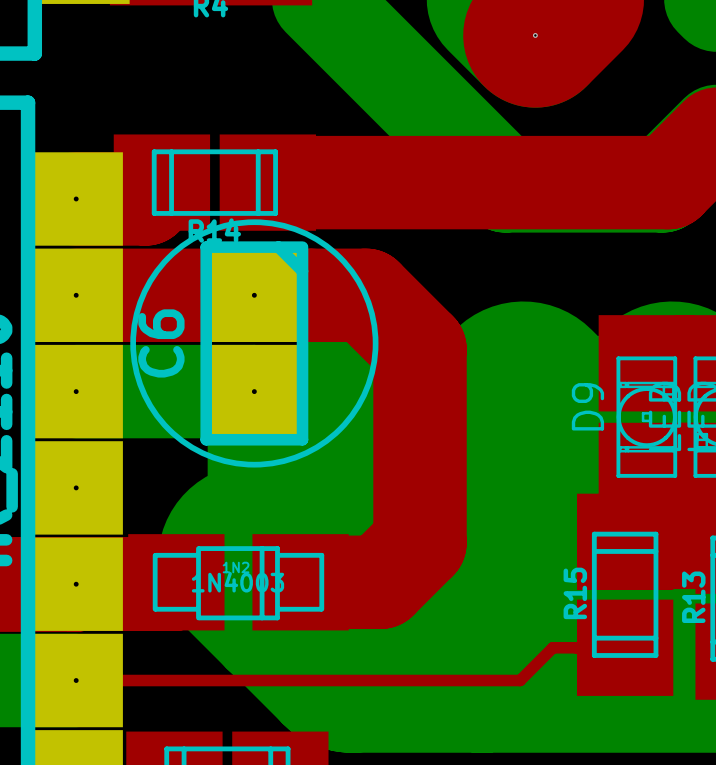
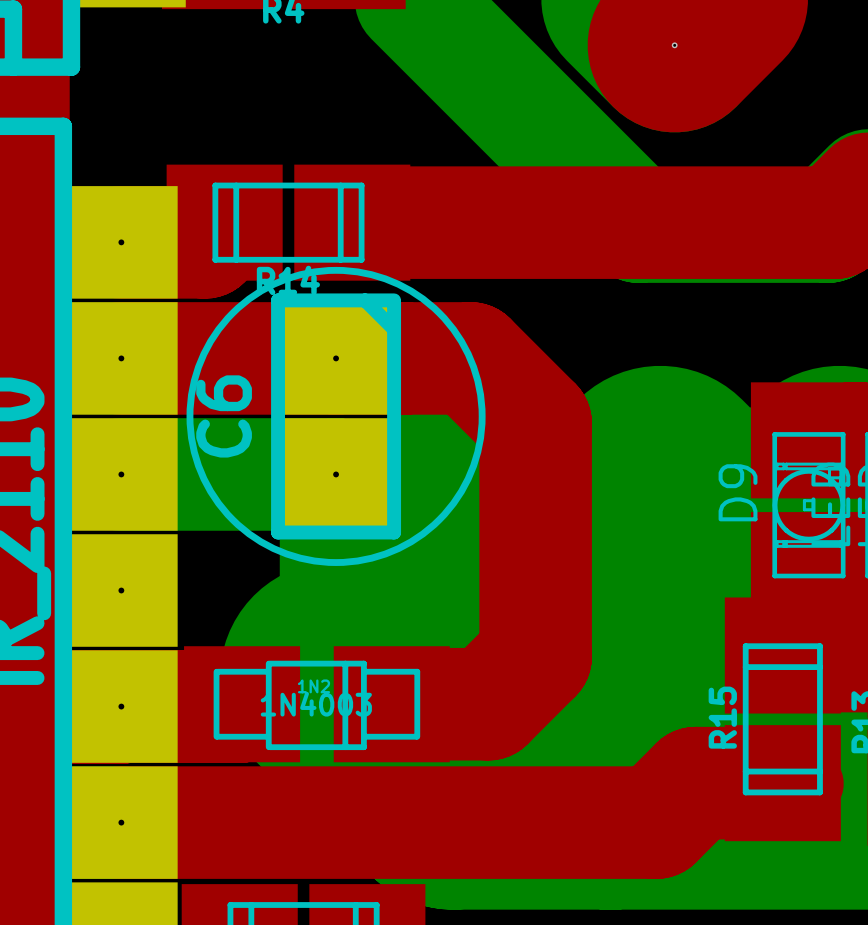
top track width: thin (625, 647) (552, 647) (520, 680) (76, 680) -> thick (782, 783) (695, 783) (656, 822) (121, 822)

